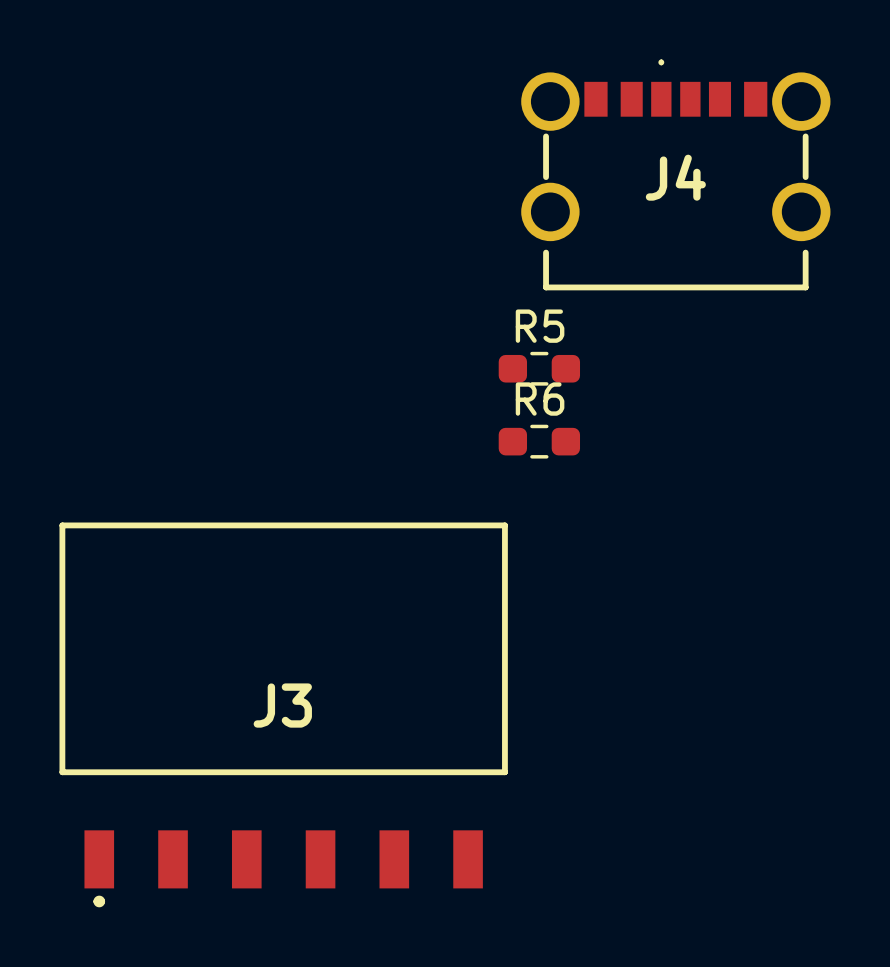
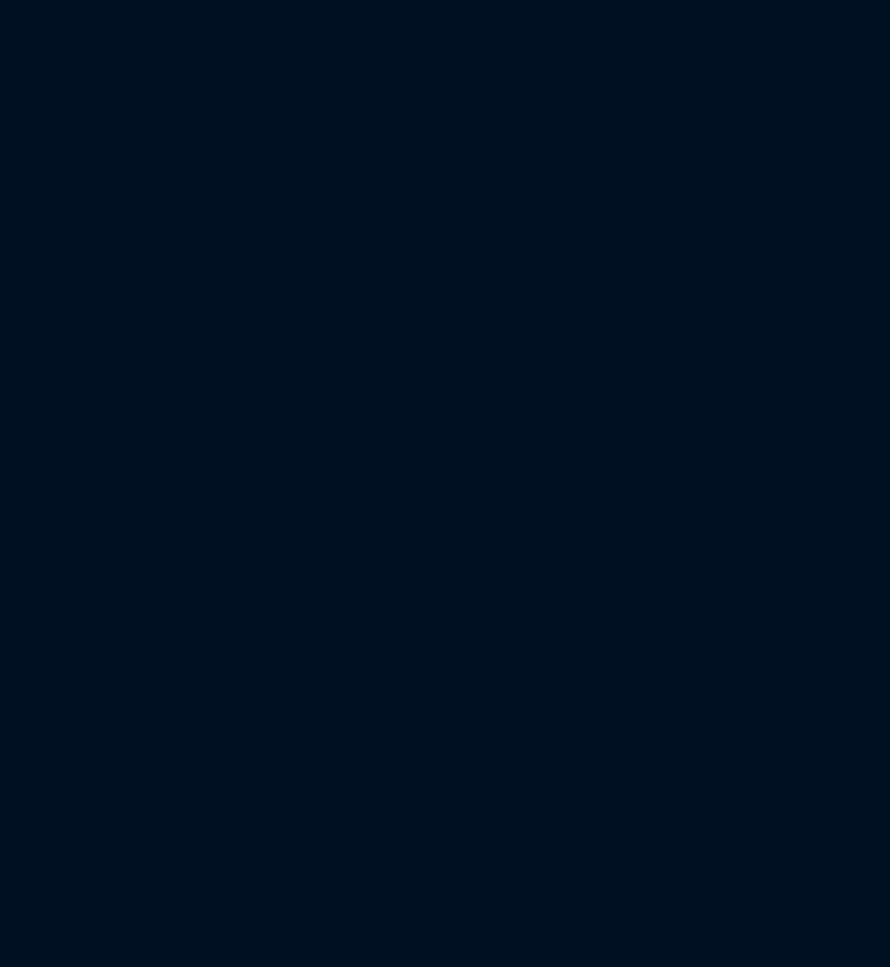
J4: (675, 174) -> none
R5: (539, 368) -> none
R6: (539, 441) -> none
J3: (283, 714) -> none

